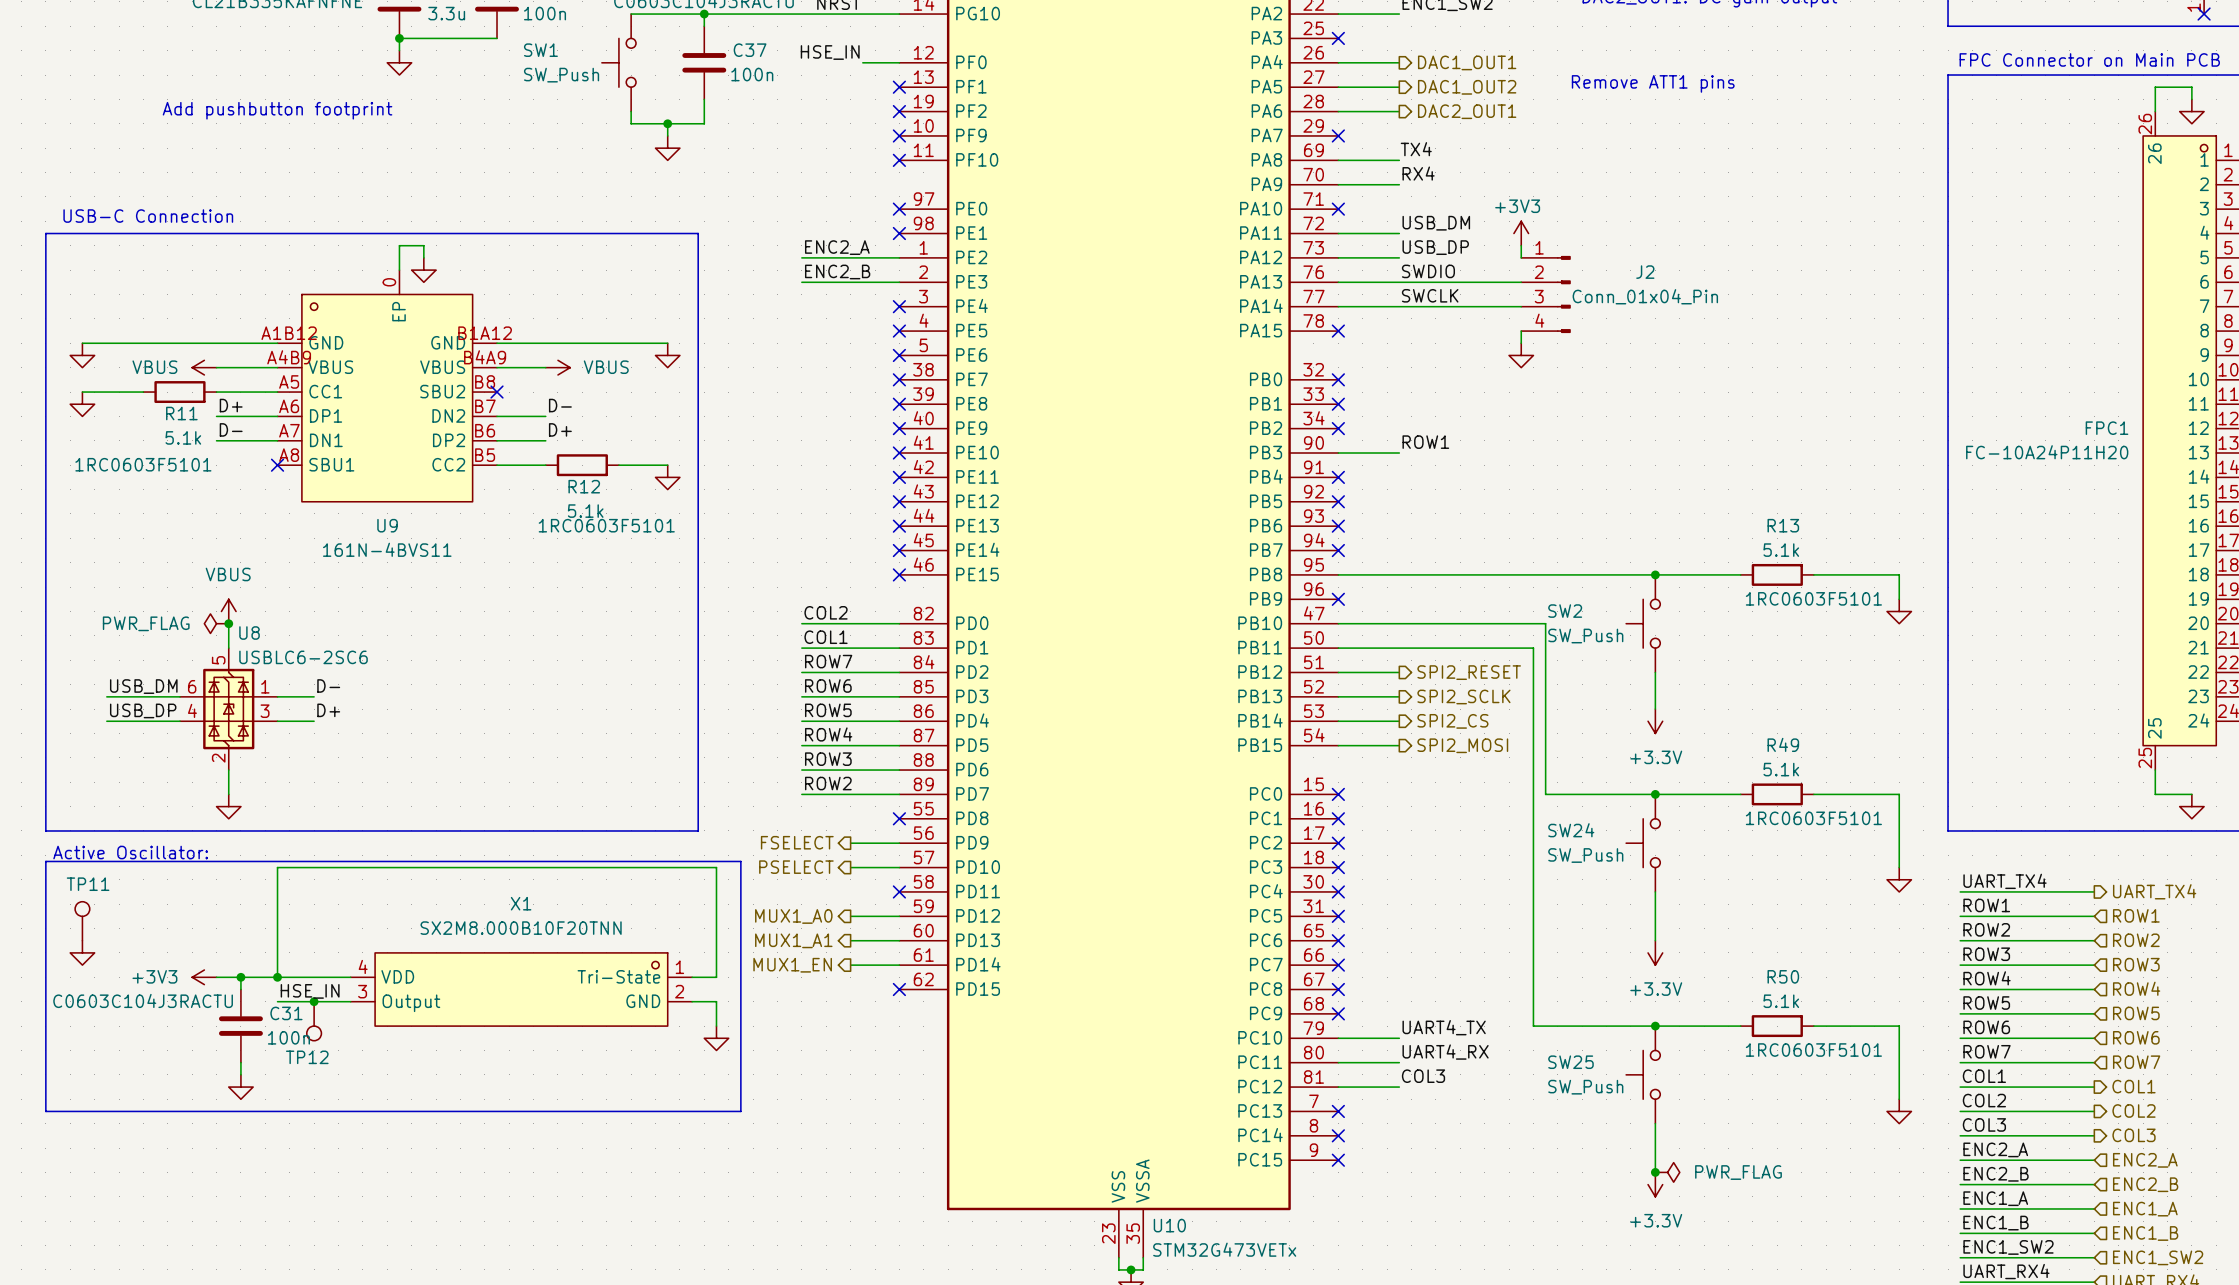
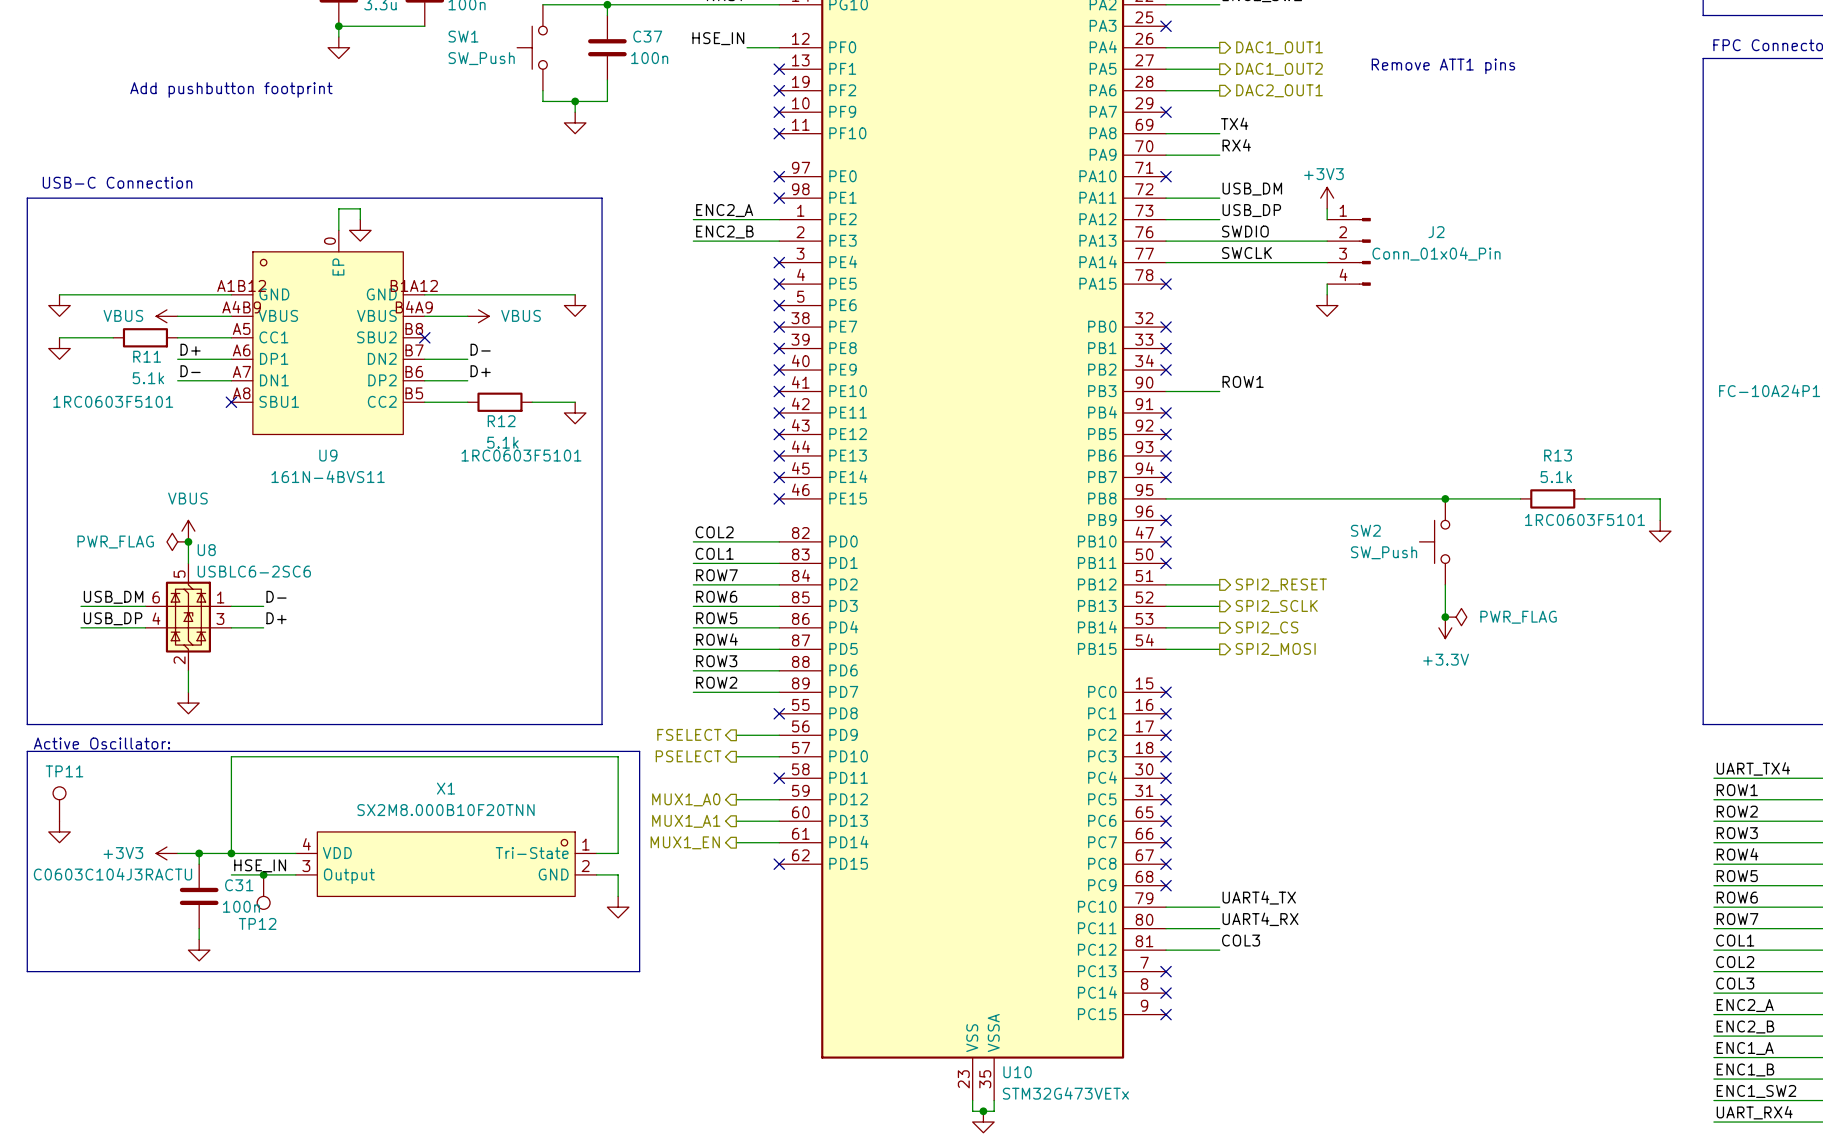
wire: (1338, 623) (1545, 623) (1545, 794) (1740, 794) -> none
no-connect mark: none -> (1166, 541)
wire: (1338, 648) (1533, 648) (1533, 1026) (1740, 1026) -> none
no-connect mark: none -> (1166, 563)
junction: none -> (1445, 617)
power symbol: none -> PWR_FLAG (1456, 617)
junction: (1655, 794) -> none
R49: 5.1k (1777, 794) -> none
wire: (1813, 794) (1899, 794) (1899, 867) -> none
SW24: SW_Push (1643, 843) -> none
power symbol: (1899, 879) -> none
wire: (1655, 891) (1655, 940) -> none
power symbol: +3.3V (1655, 952) -> none
junction: (1655, 1026) -> none
R50: 5.1k (1777, 1026) -> none
wire: (1813, 1026) (1899, 1026) (1899, 1099) -> none
SW25: SW_Push (1643, 1074) -> none
power symbol: (1899, 1111) -> none
wire: (1655, 1123) (1655, 1172) -> none
junction: (1655, 1172) -> none
power symbol: PWR_FLAG (1667, 1172) -> none
power symbol: +3.3V (1655, 1184) -> none

